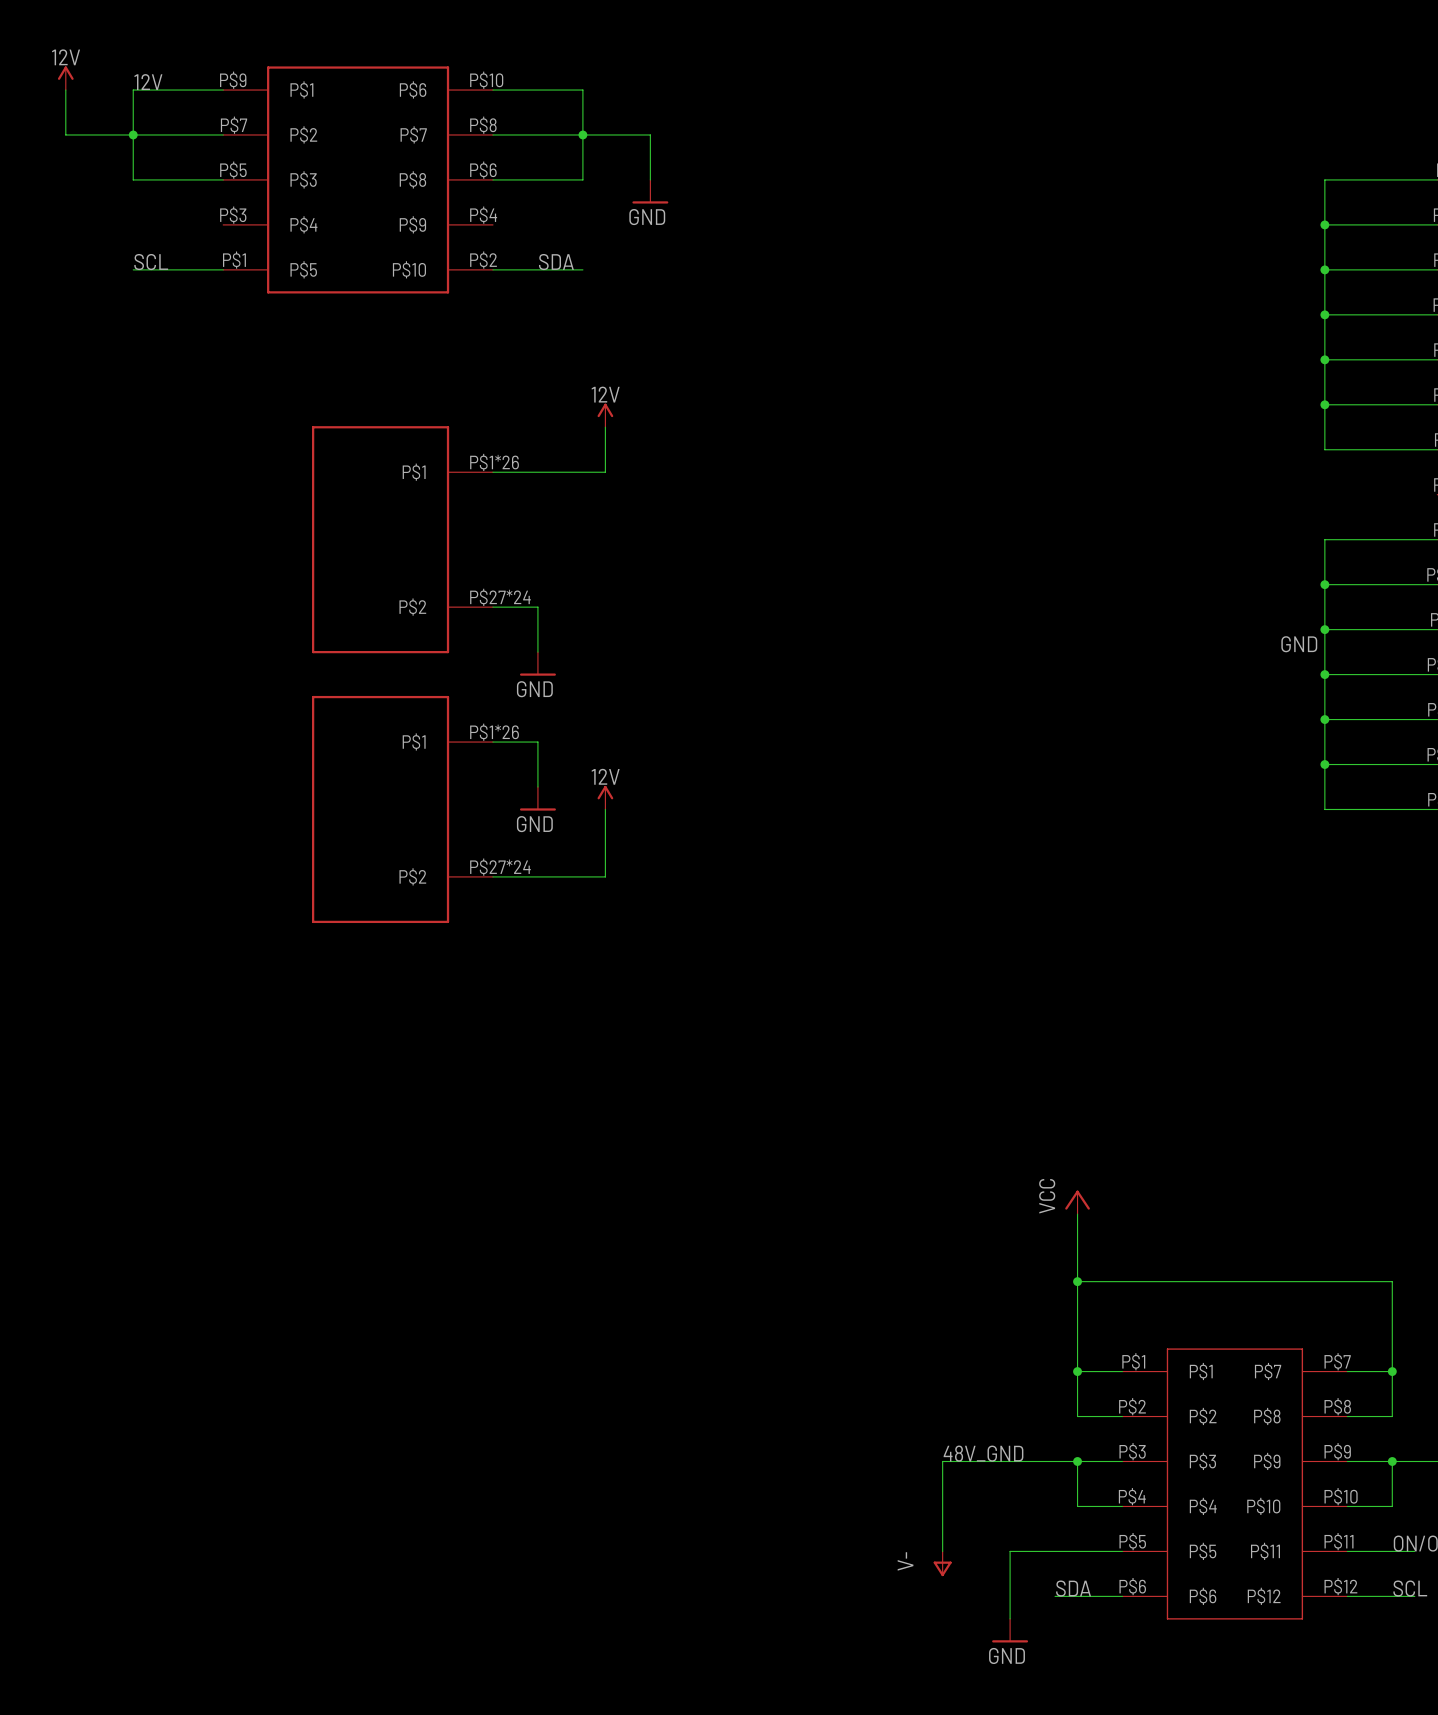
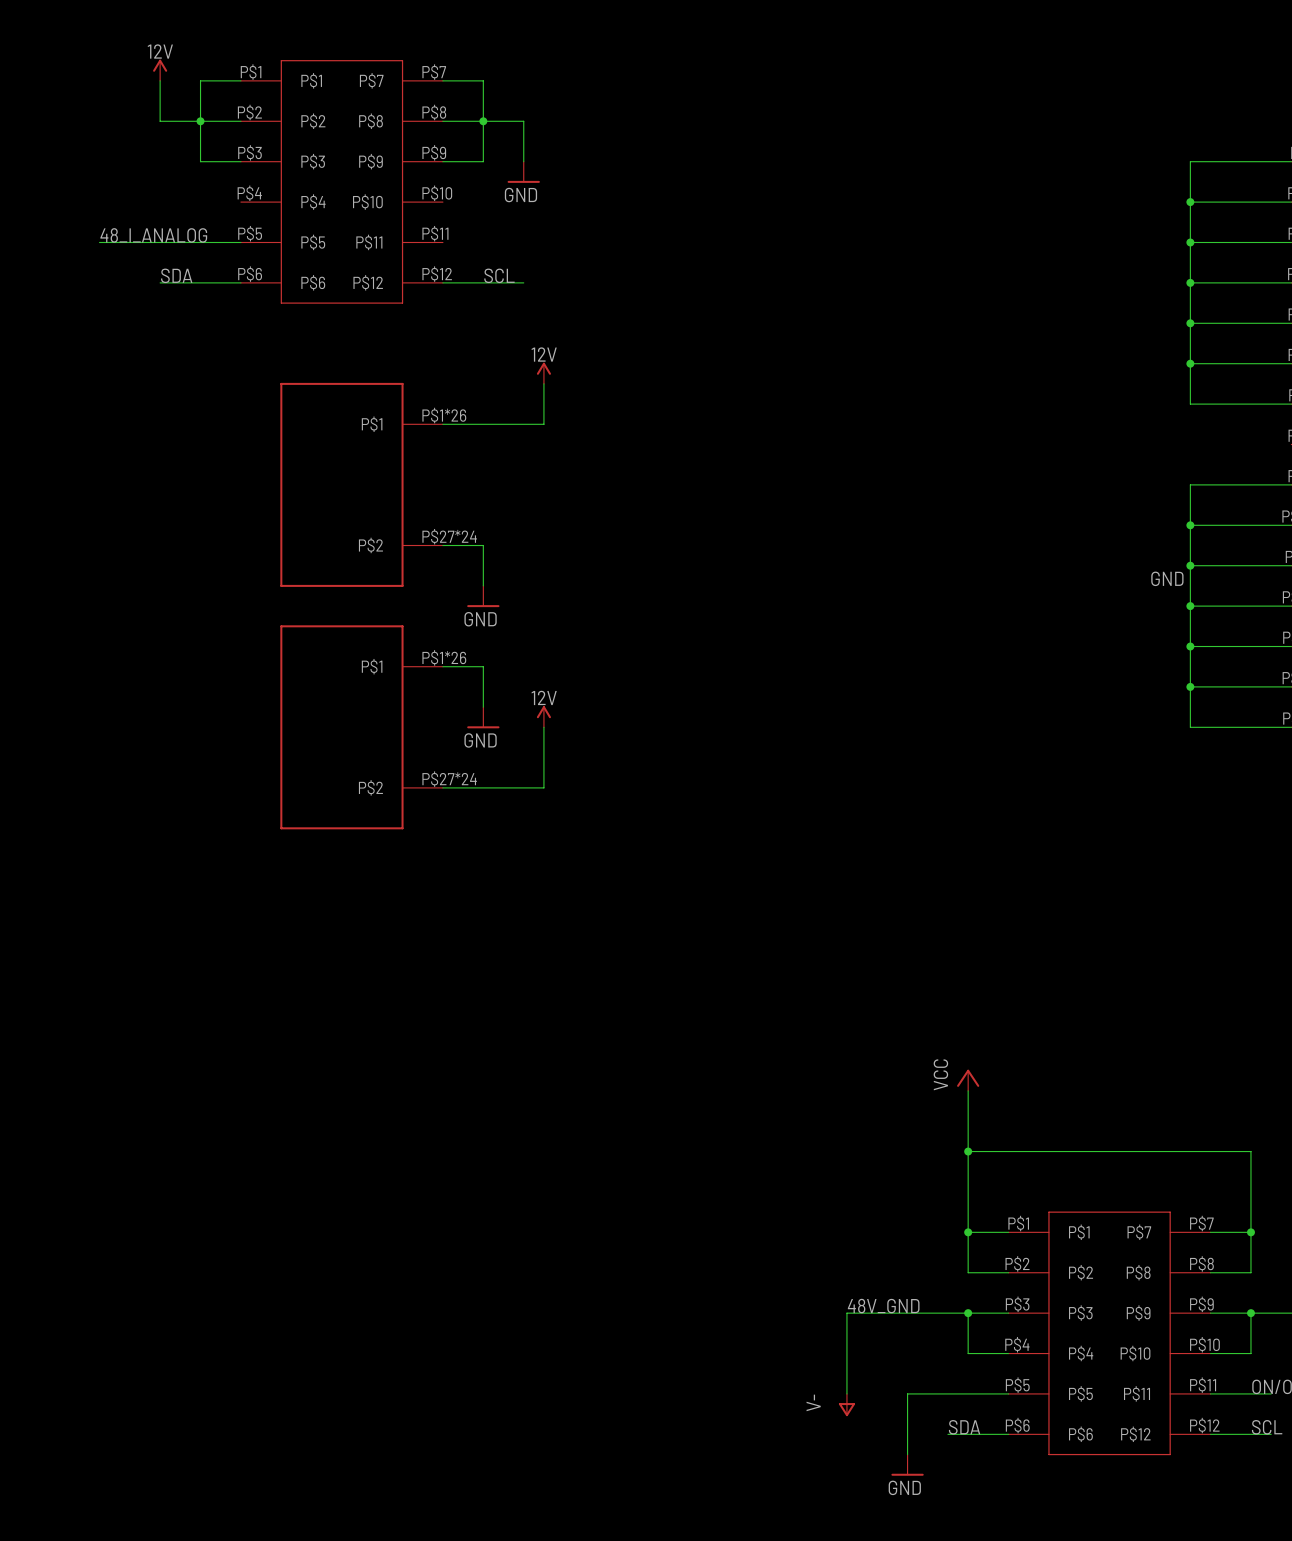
power symbol position: 12V (65, 78) -> 12V (160, 70)
label: 12V (148, 82) -> none
wire: (65, 90) (65, 134) (178, 134) -> (160, 80) (160, 121)
wire: (223, 90) (133, 90) (133, 179) (223, 179) -> none
wire: none -> (240, 80) (200, 80) (200, 161) (240, 161)
wire: (537, 90) (582, 90) (582, 134) (650, 134) (650, 179) -> none
junction: (133, 134) -> none
junction: none -> (200, 121)
junction position: (582, 134) -> (483, 121)
part: (358, 179) -> none
wire: (537, 179) (582, 179) -> (483, 161) (483, 80)
power symbol position: GND (650, 191) -> GND (523, 172)
part: none -> (341, 181)
label: none -> 48_I_ANALOG (153, 235)
label: SCL (151, 262) -> none
label: SDA (556, 262) -> none
wire: none -> (99, 242) (119, 242)
wire: (492, 269) (582, 269) -> (442, 282) (523, 282)
label: none -> SDA (176, 275)
label: none -> SCL (499, 275)
wire: none -> (160, 282) (240, 282)

